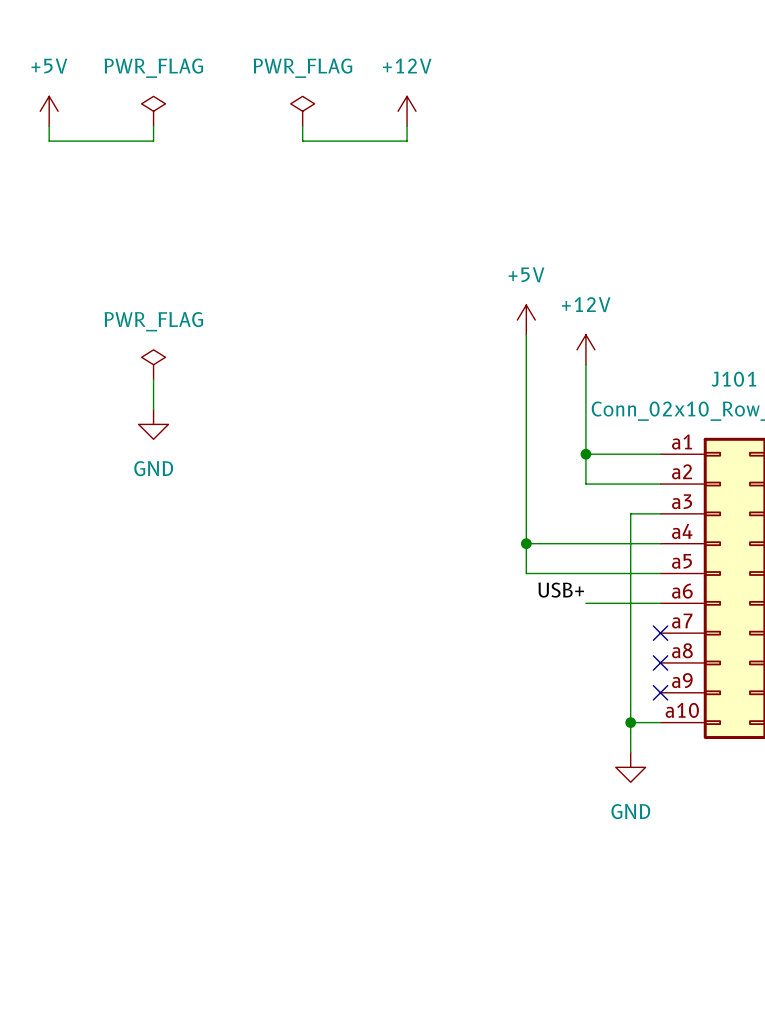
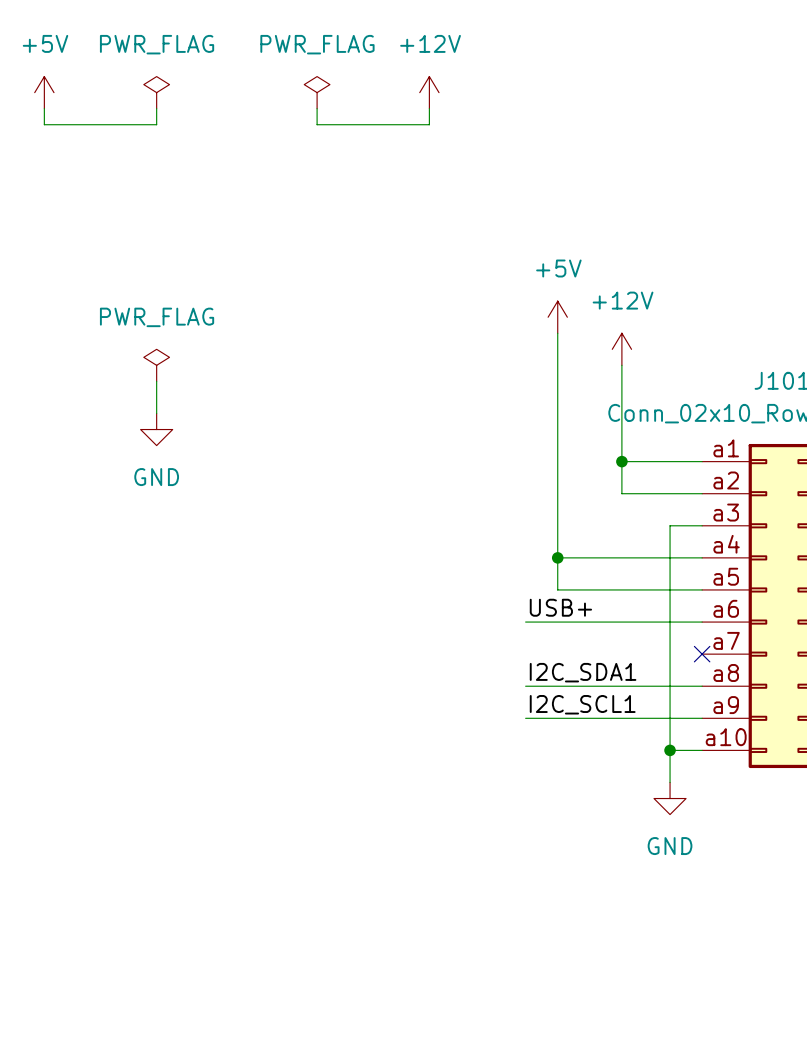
label position: USB+ (561, 590) -> USB+ (560, 607)
wire: none -> (525, 622) (621, 622)
label: none -> I2C_SDA1 (583, 672)
wire: none -> (525, 686) (702, 686)
no-connect mark: (660, 662) -> none
label: none -> I2C_SCL1 (582, 704)
wire: none -> (525, 718) (702, 718)
no-connect mark: (660, 692) -> none

